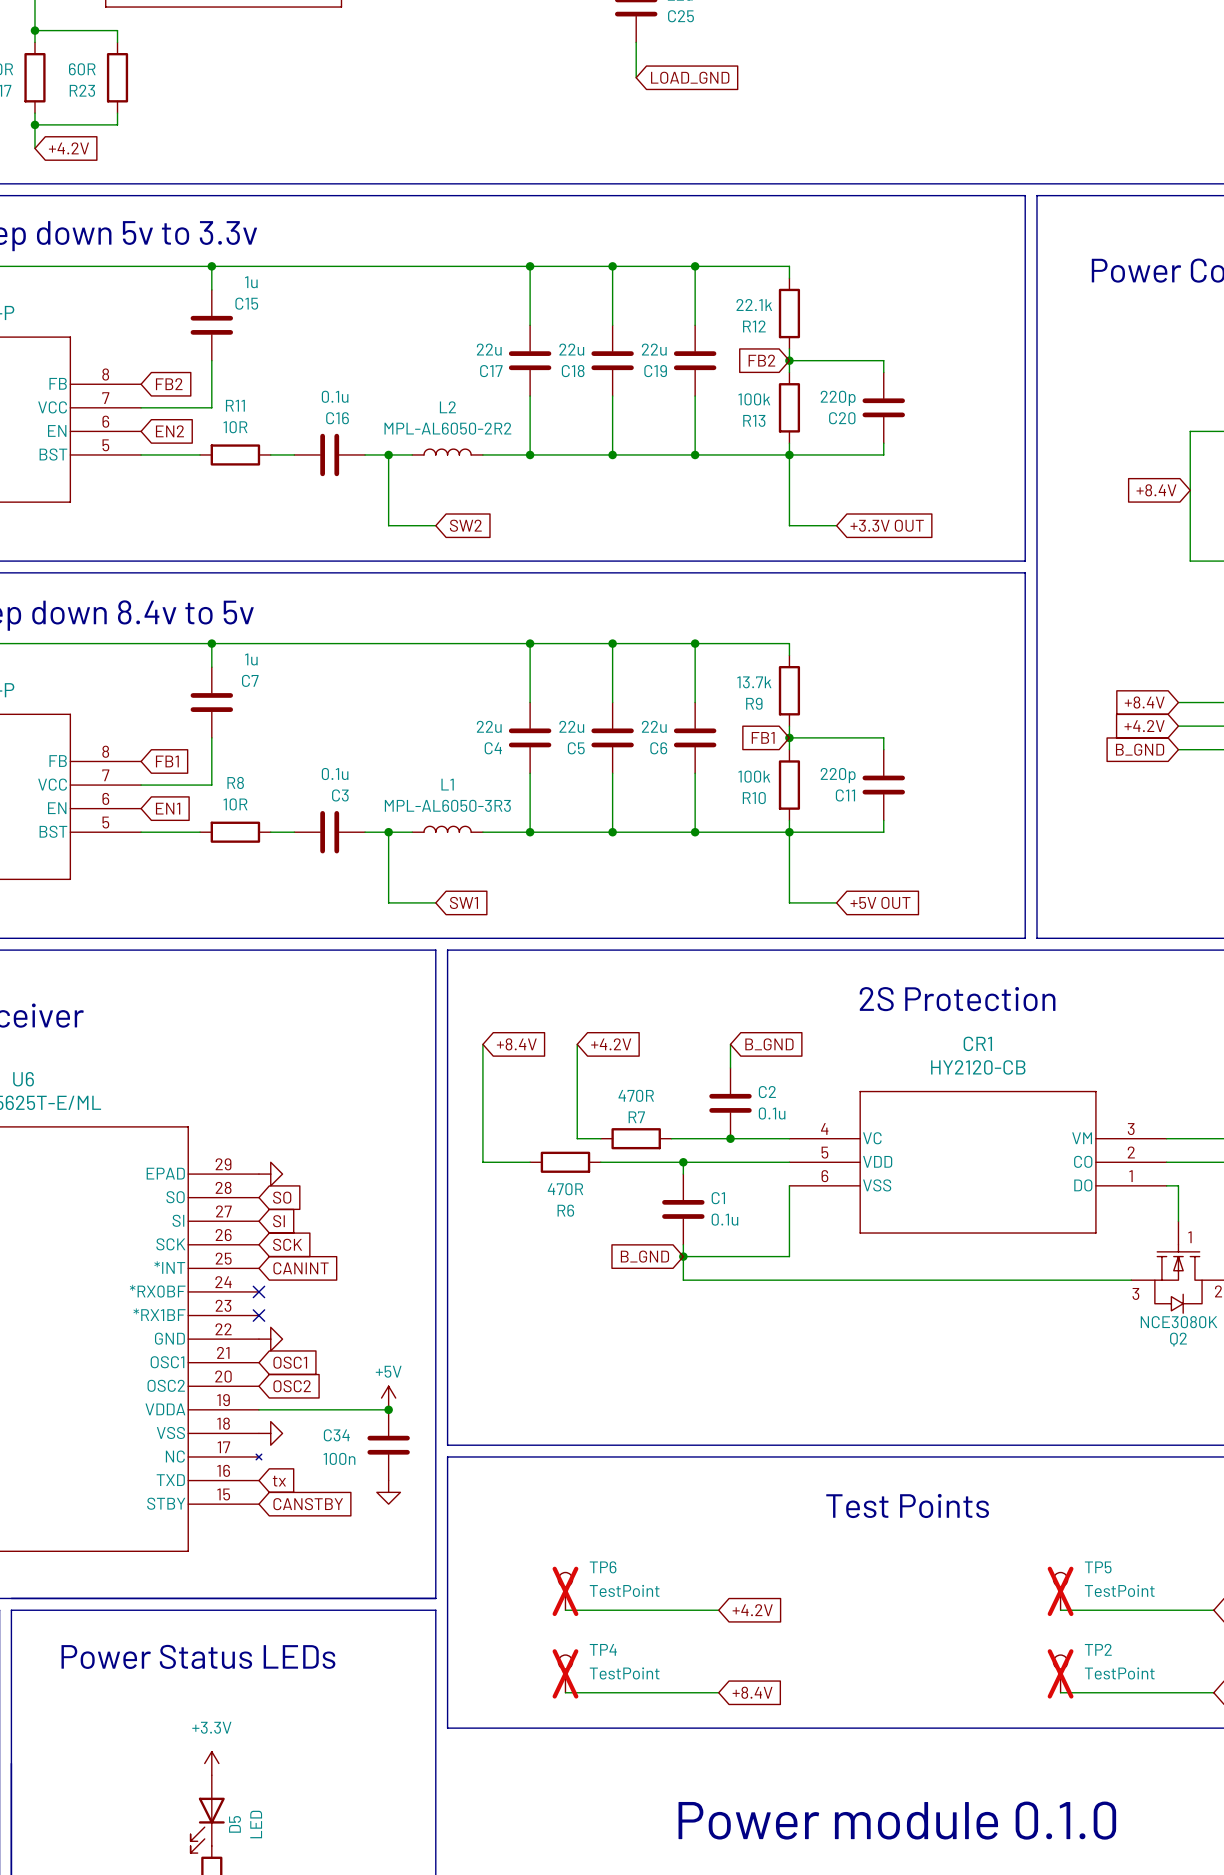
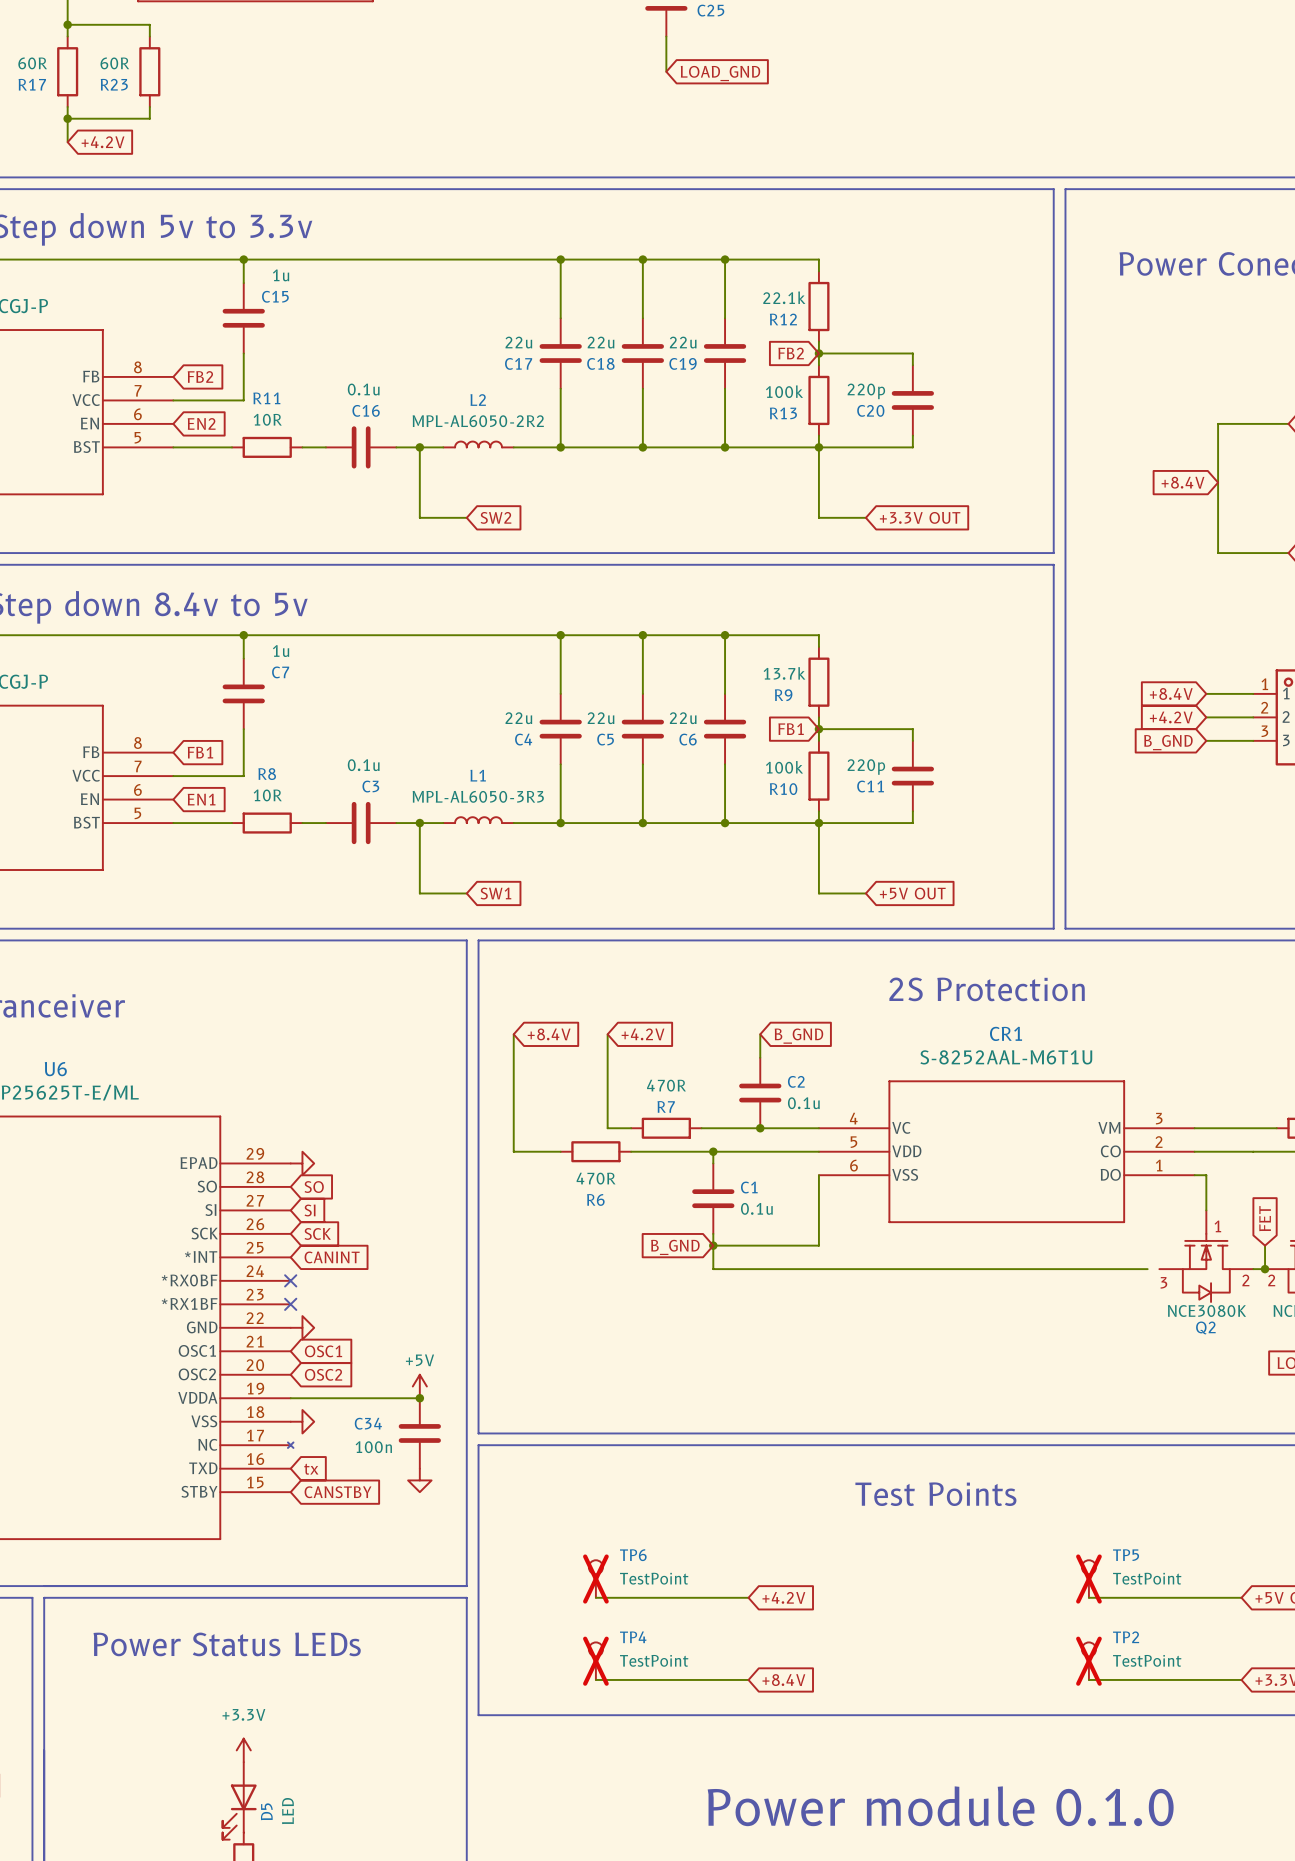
CR1 value: HY2120-CB (978, 1067) -> S-8252AAL-M6T1U (1006, 1057)
wire: (1119, 1280) (1131, 1280) -> none

